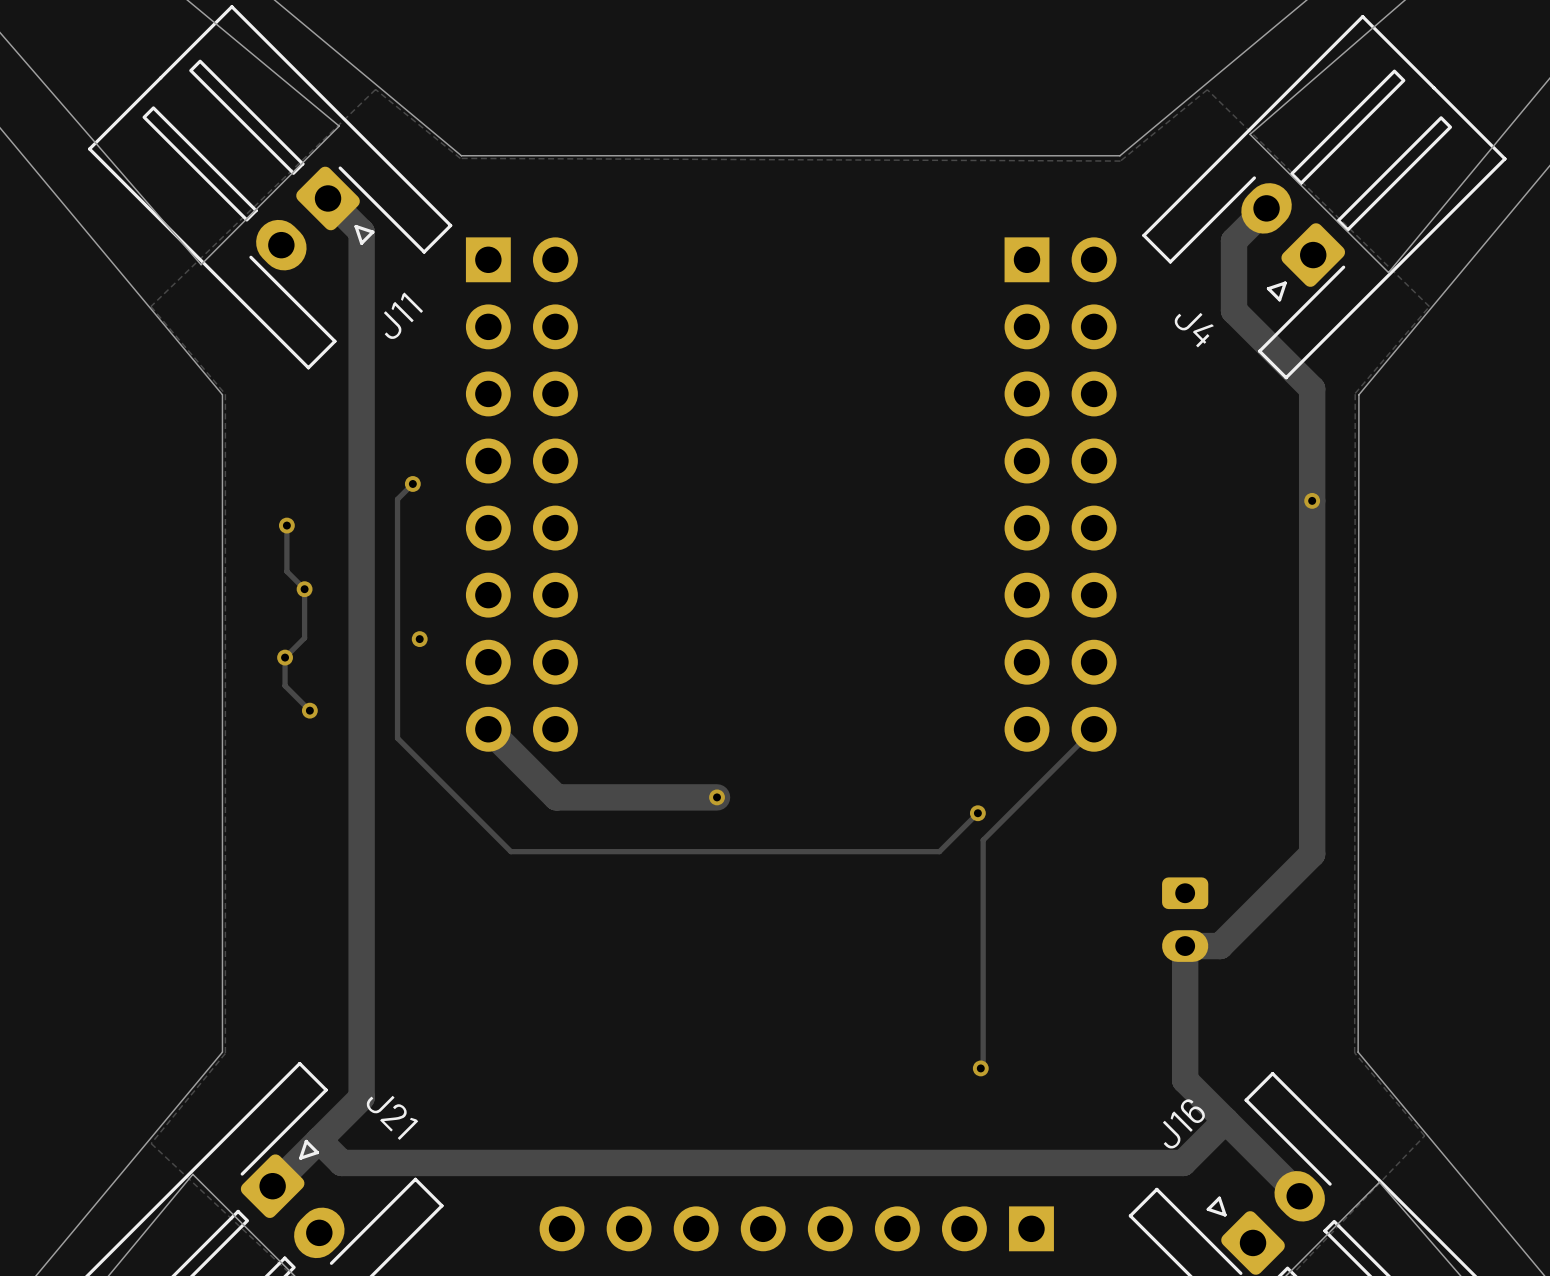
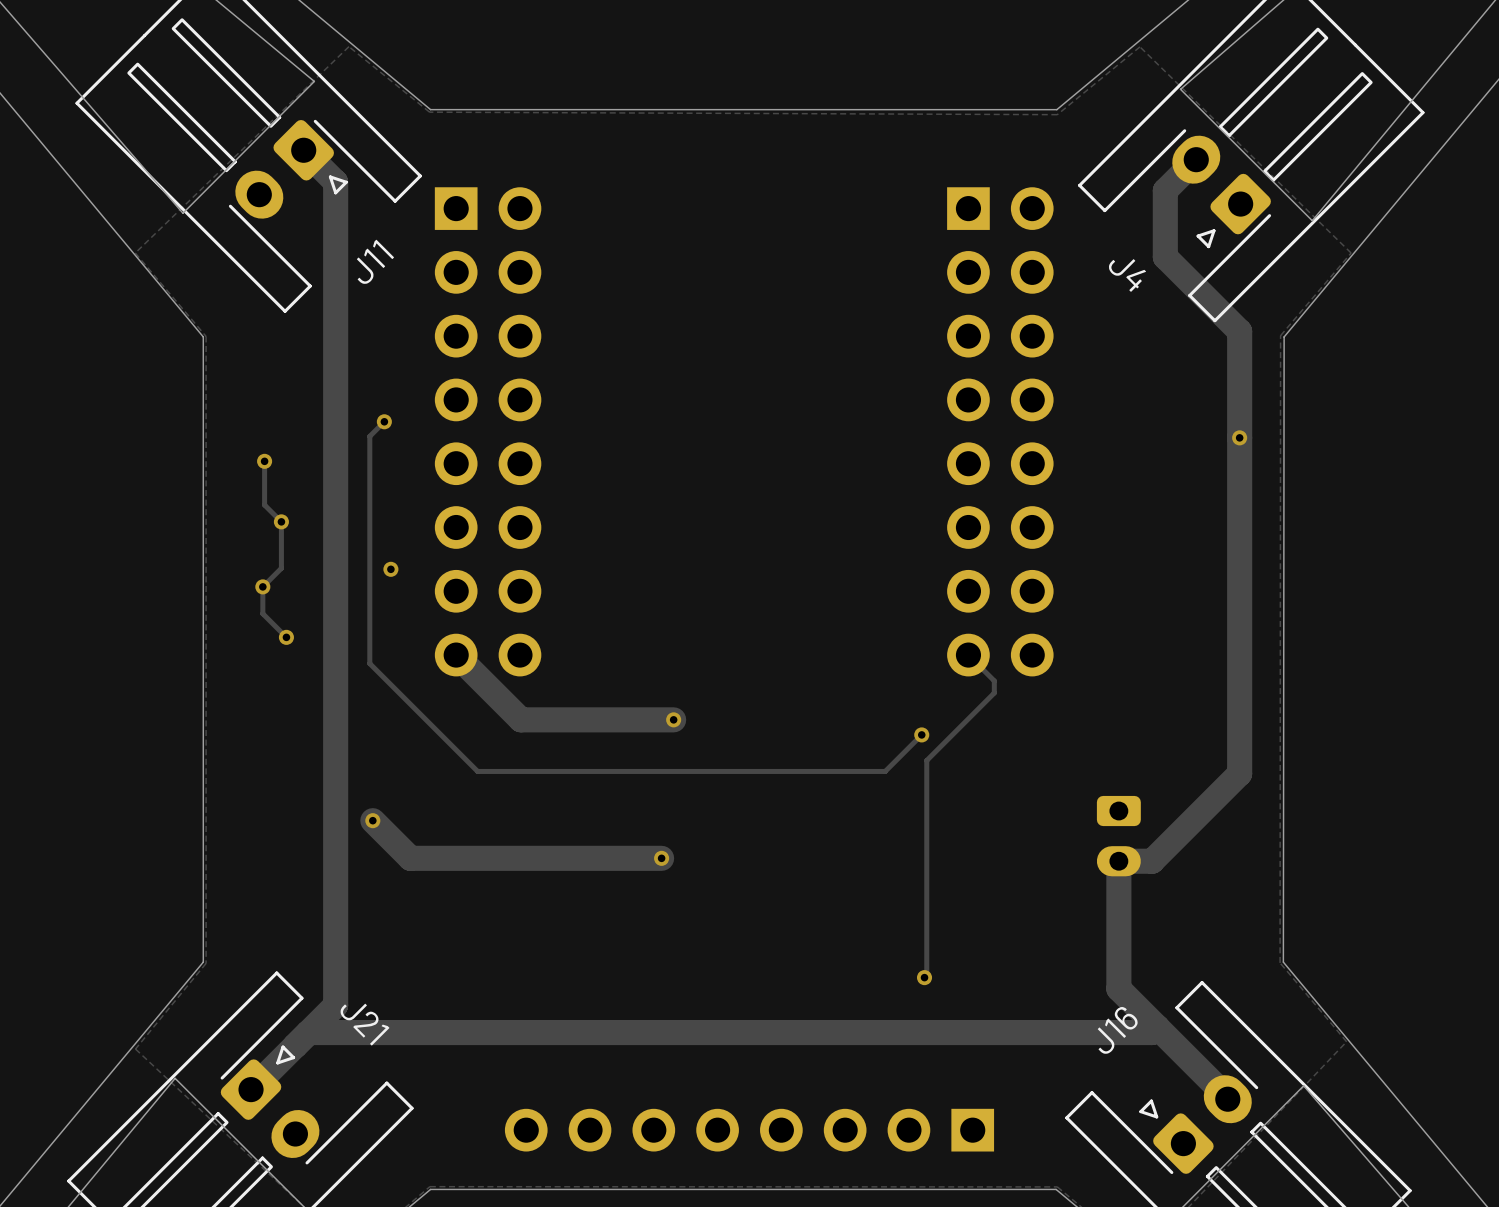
track: (1094, 729) (1054, 769) -> (968, 655) (994, 680) (994, 692)
track: none -> (372, 820) (410, 858) (661, 858)
via: none -> (372, 820)
via: none -> (661, 858)
track: (1219, 1126) (1183, 1162) (341, 1162) (318, 1140) -> (1151, 1032) (308, 1032)

